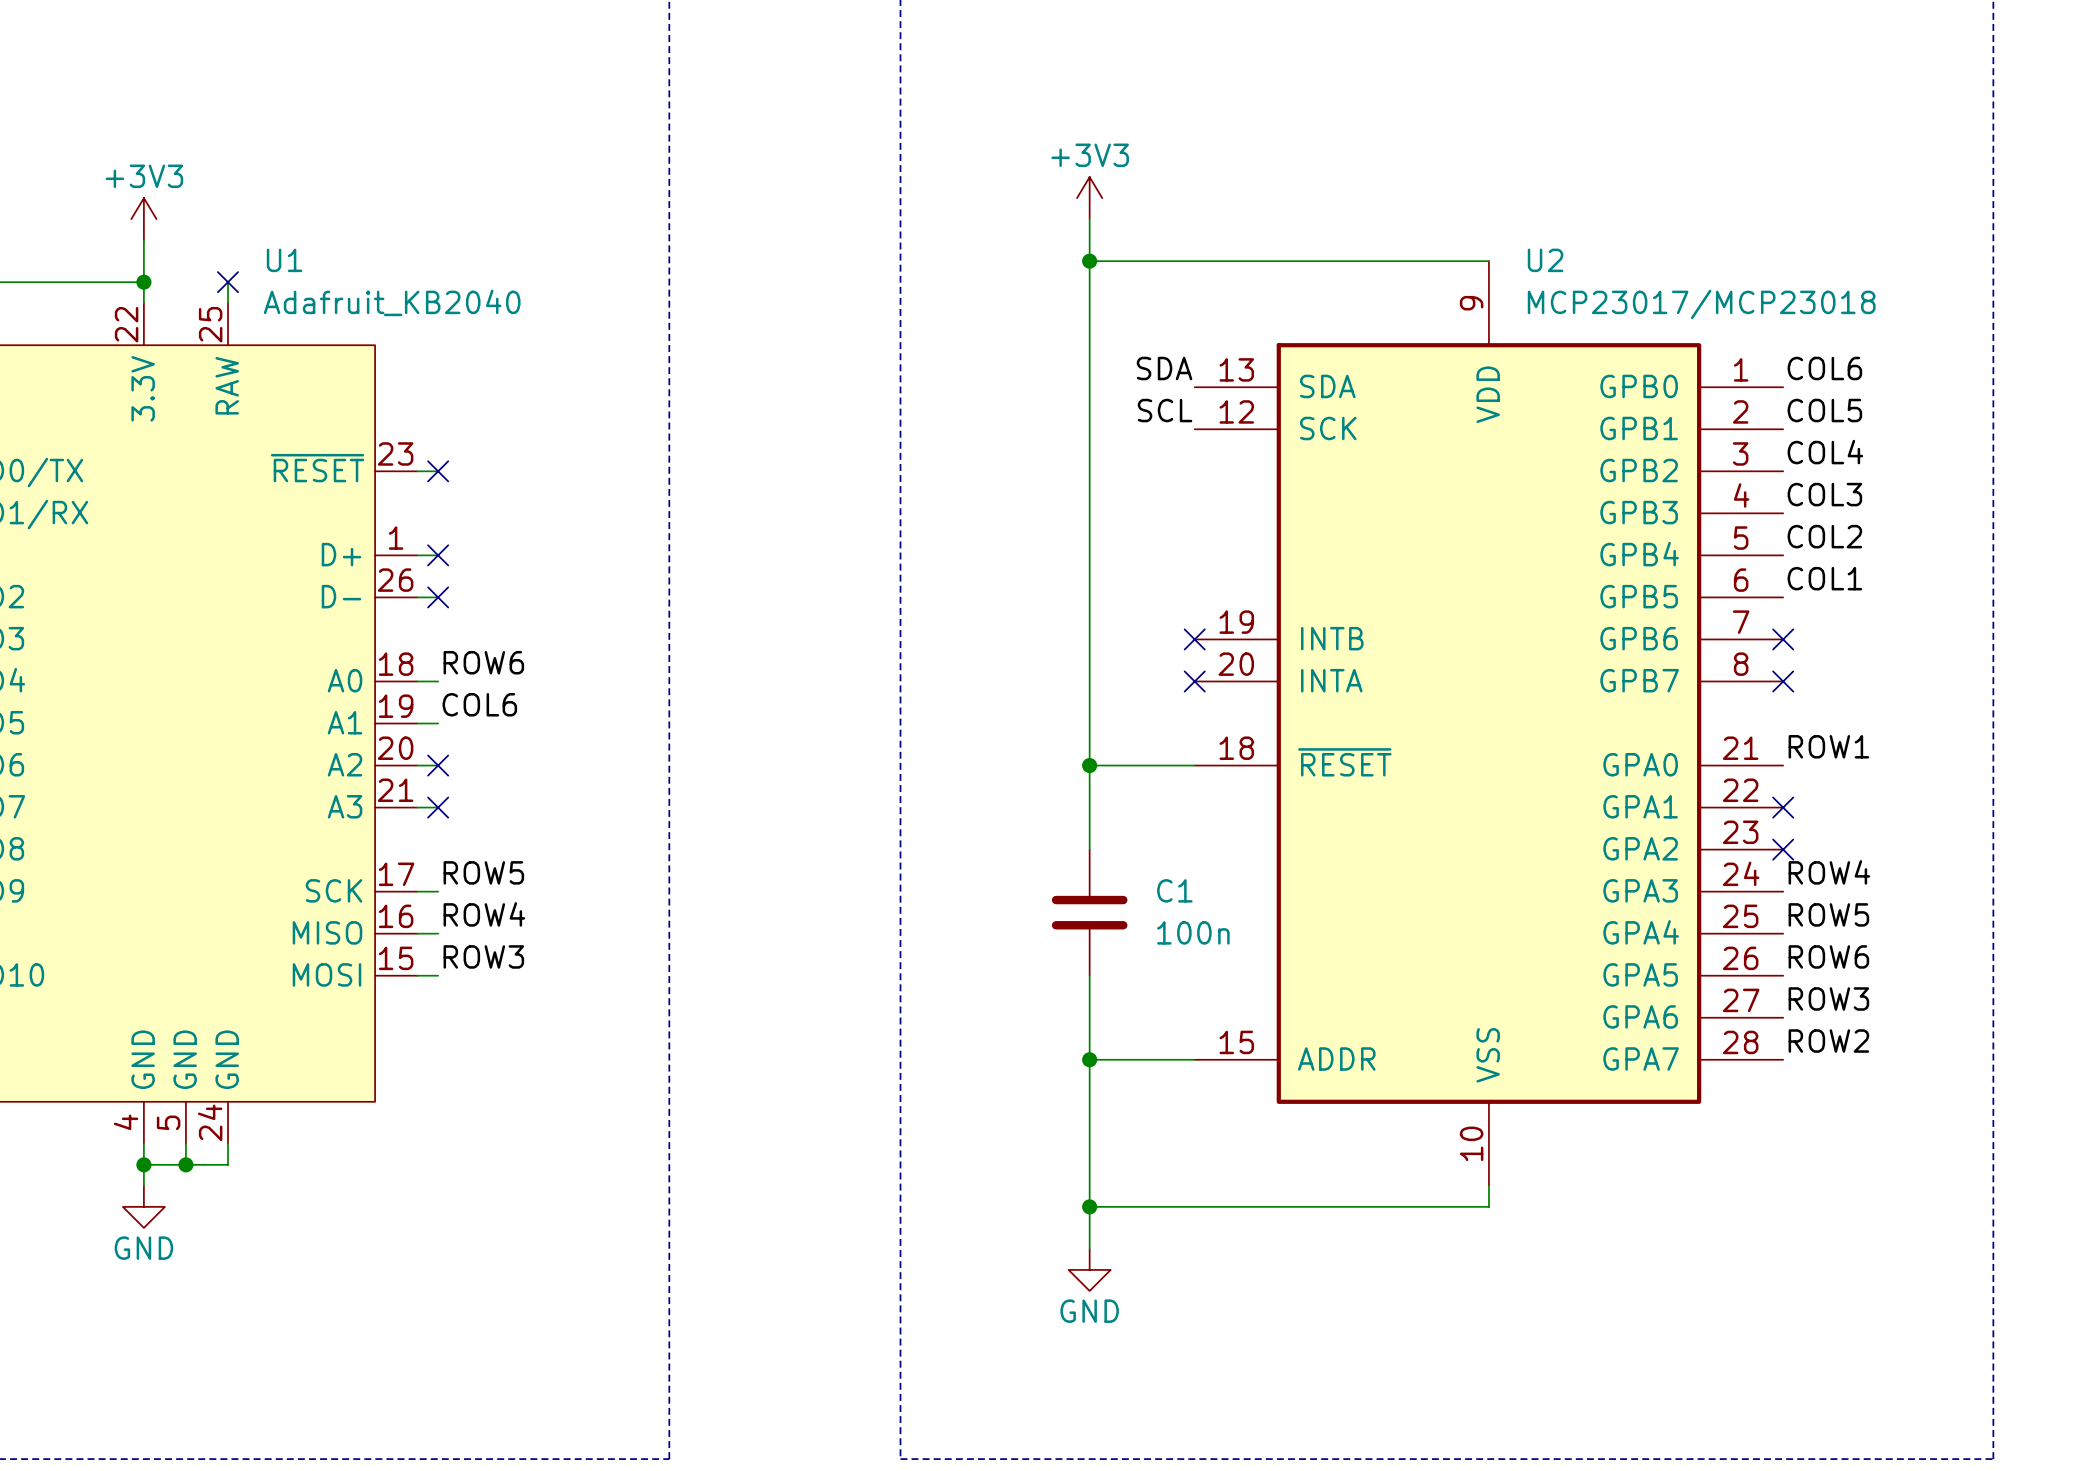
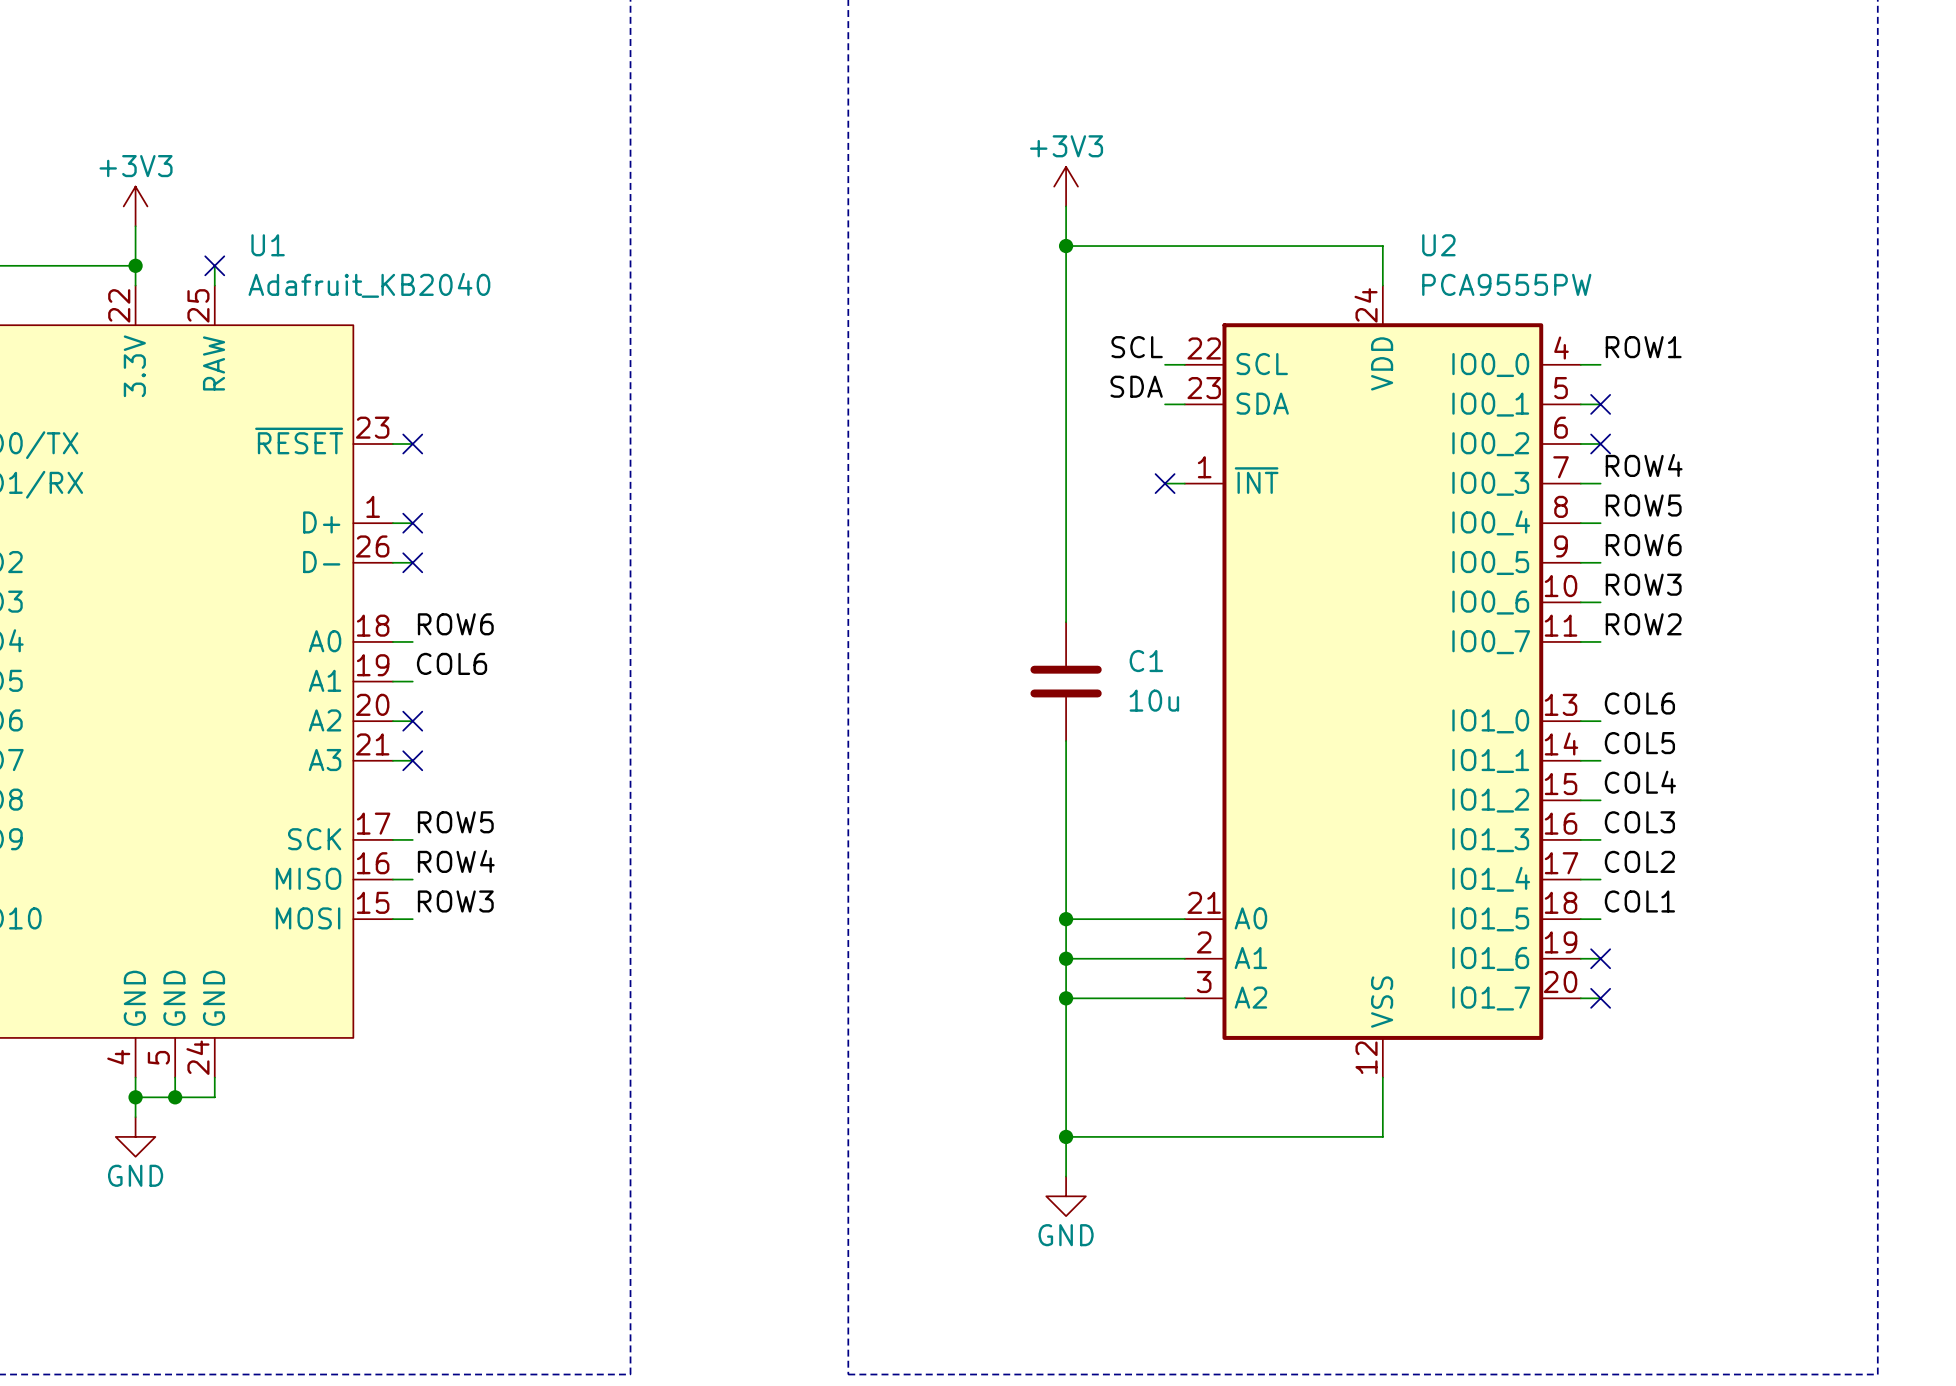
power symbol position: +3V3 (1089, 198) -> +3V3 (1066, 186)
wire: (1089, 219) (1089, 849) -> none
wire: none -> (1066, 206) (1066, 622)
wire: (1089, 261) (1131, 261) -> none
junction position: (1089, 261) -> (1066, 246)
U2 symbol: [1194, 261, 1784, 1186] -> [1184, 285, 1581, 1078]
wire: (1467, 261) (1488, 261) -> (1382, 246) (1382, 285)
U2 value: MCP23017/MCP23018 (1701, 304) -> PCA9555PW (1506, 284)
label position: SDA (1164, 368) -> SDA (1136, 386)
label position: COL6 (1824, 368) -> COL6 (1639, 703)
label position: SCL (1165, 410) -> SCL (1137, 347)
label position: COL5 (1824, 410) -> COL5 (1639, 743)
no-connect mark: none -> (1600, 404)
label position: COL4 (1825, 452) -> COL4 (1640, 782)
no-connect mark: none -> (1600, 444)
label position: COL3 (1824, 494) -> COL3 (1639, 822)
wire: none -> (1165, 483) (1184, 483)
no-connect mark: none -> (1165, 483)
label position: COL2 (1824, 536) -> COL2 (1639, 861)
label position: COL1 (1824, 578) -> COL1 (1639, 901)
no-connect mark: (1194, 639) -> none
no-connect mark: (1783, 639) -> none
no-connect mark: (1194, 681) -> none
no-connect mark: (1783, 681) -> none
label position: ROW1 (1828, 746) -> ROW1 (1643, 347)
wire: (1089, 765) (1194, 765) -> none
junction: (1089, 765) -> none
wire: none -> (1066, 740) (1066, 1176)
no-connect mark: (1783, 807) -> none
no-connect mark: (1783, 849) -> none
label position: ROW4 (1829, 872) -> ROW4 (1644, 465)
C1 position: (1089, 912) -> (1066, 681)
label position: ROW5 (1828, 914) -> ROW5 (1643, 505)
C1 value: 100n (1193, 932) -> 10u (1154, 700)
label position: ROW6 (1828, 956) -> ROW6 (1643, 545)
wire: (1089, 975) (1089, 1248) -> none
wire: none -> (1066, 919) (1184, 919)
junction: none -> (1066, 919)
label position: ROW3 (1828, 998) -> ROW3 (1643, 584)
wire: none -> (1066, 958) (1184, 958)
junction: none -> (1066, 958)
no-connect mark: none -> (1600, 958)
label position: ROW2 (1828, 1041) -> ROW2 (1643, 624)
wire: (1089, 1059) (1131, 1059) -> none
junction: (1089, 1059) -> none
junction: none -> (1066, 998)
no-connect mark: none -> (1600, 998)
wire: (1488, 1185) (1488, 1206) (1467, 1206) -> (1382, 1077) (1382, 1136)
wire: (1089, 1206) (1131, 1206) -> none
junction position: (1089, 1206) -> (1066, 1136)
power symbol position: GND (1089, 1269) -> GND (1066, 1196)

